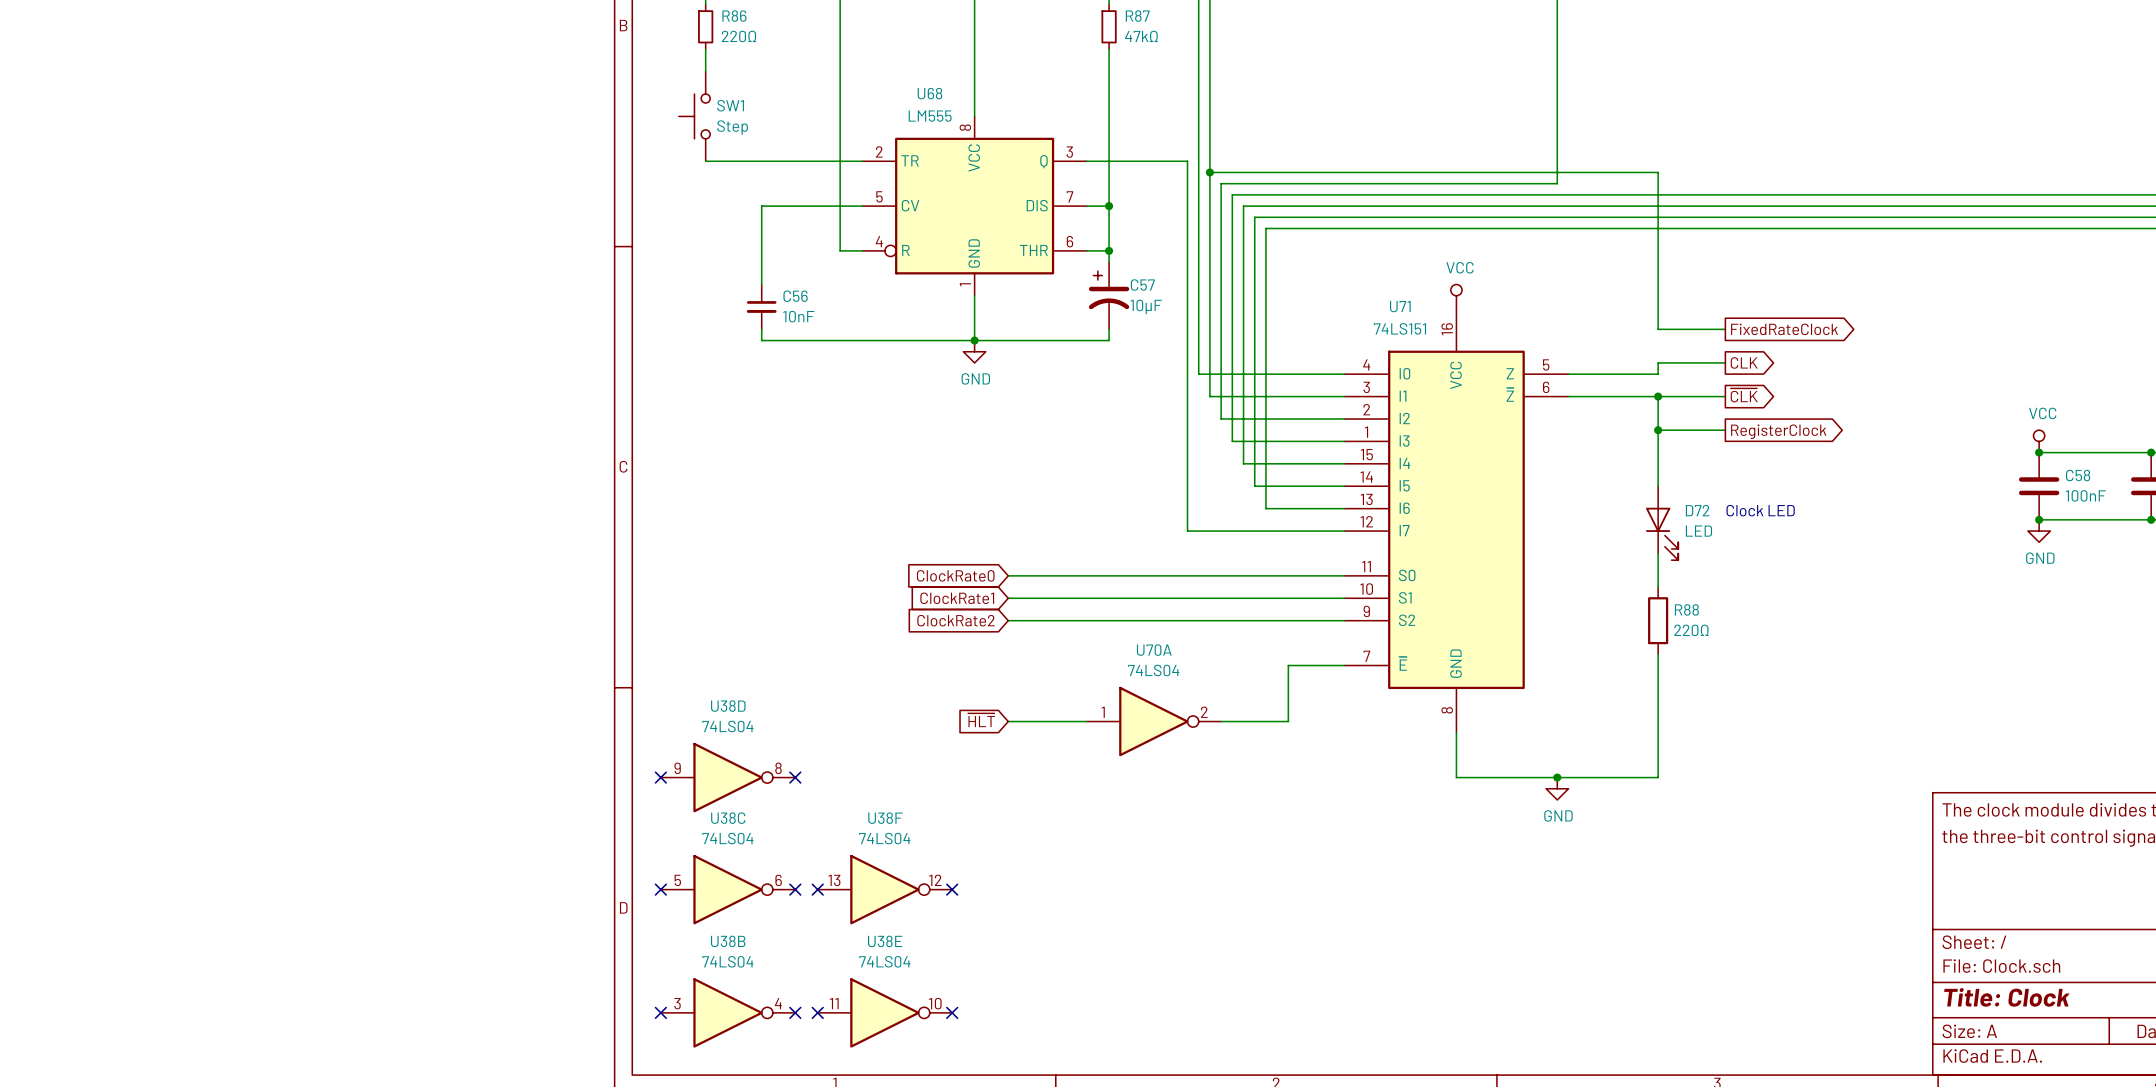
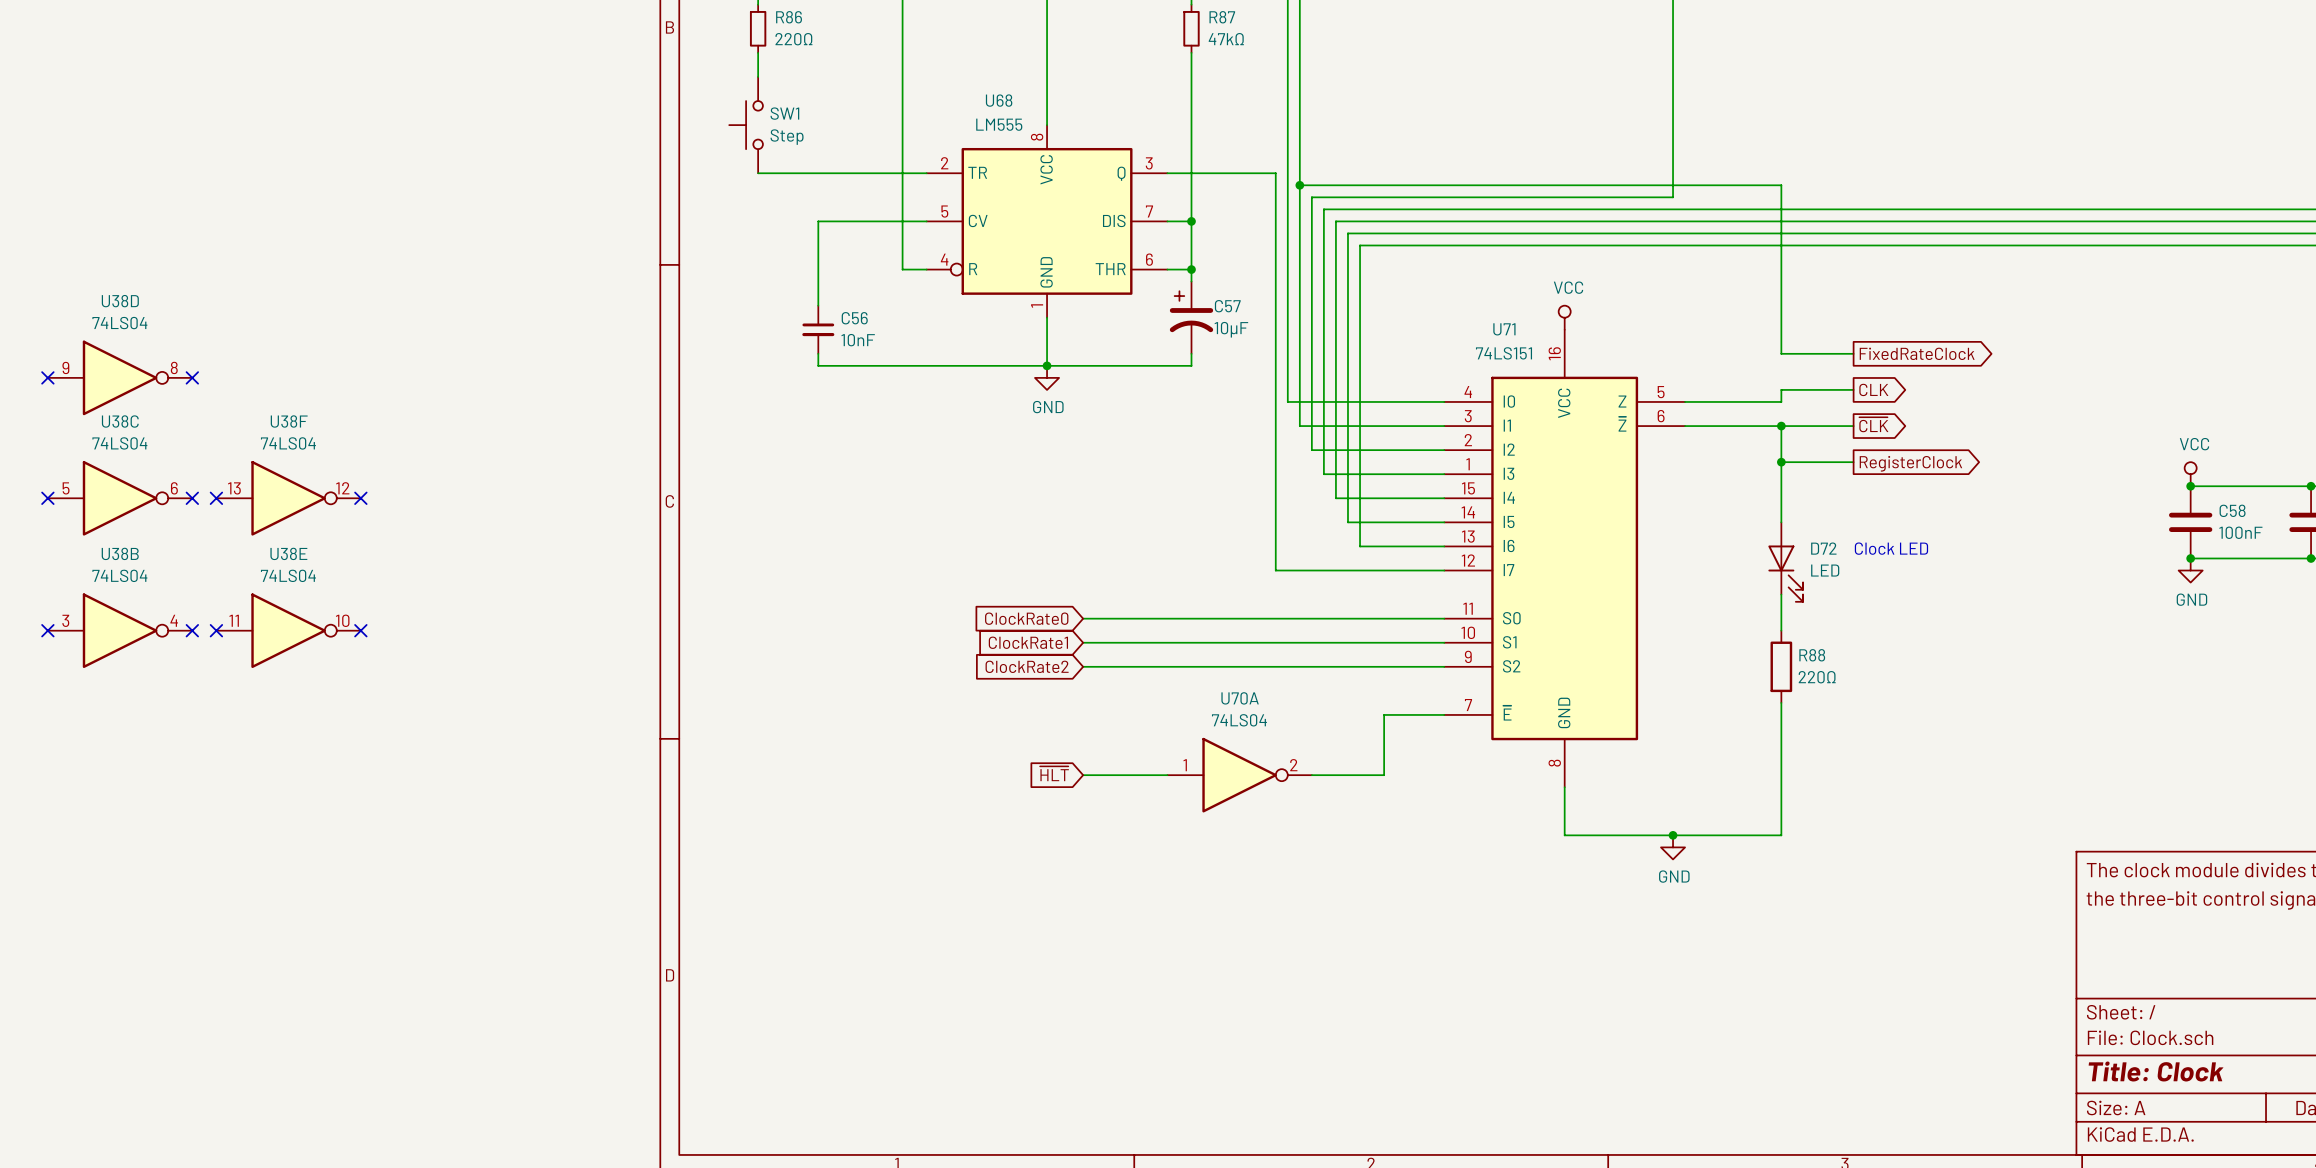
no-connect mark: none -> (47, 377)
no-connect mark: none -> (192, 377)
no-connect mark: none -> (47, 498)
no-connect mark: none -> (192, 498)
no-connect mark: none -> (216, 498)
no-connect mark: none -> (360, 498)
no-connect mark: none -> (47, 630)
no-connect mark: none -> (192, 630)
no-connect mark: none -> (216, 630)
no-connect mark: none -> (360, 630)
no-connect mark: (660, 777) -> none
U38D position: (728, 777) -> (120, 377)
no-connect mark: (795, 777) -> none
no-connect mark: (660, 889) -> none
U38C position: (728, 889) -> (120, 498)
no-connect mark: (795, 889) -> none
no-connect mark: (817, 889) -> none
U38F position: (884, 889) -> (288, 498)
no-connect mark: (952, 889) -> none
no-connect mark: (660, 1012) -> none
U38B position: (728, 1012) -> (120, 630)
no-connect mark: (795, 1012) -> none
no-connect mark: (817, 1012) -> none
U38E position: (884, 1012) -> (288, 630)
no-connect mark: (952, 1012) -> none

